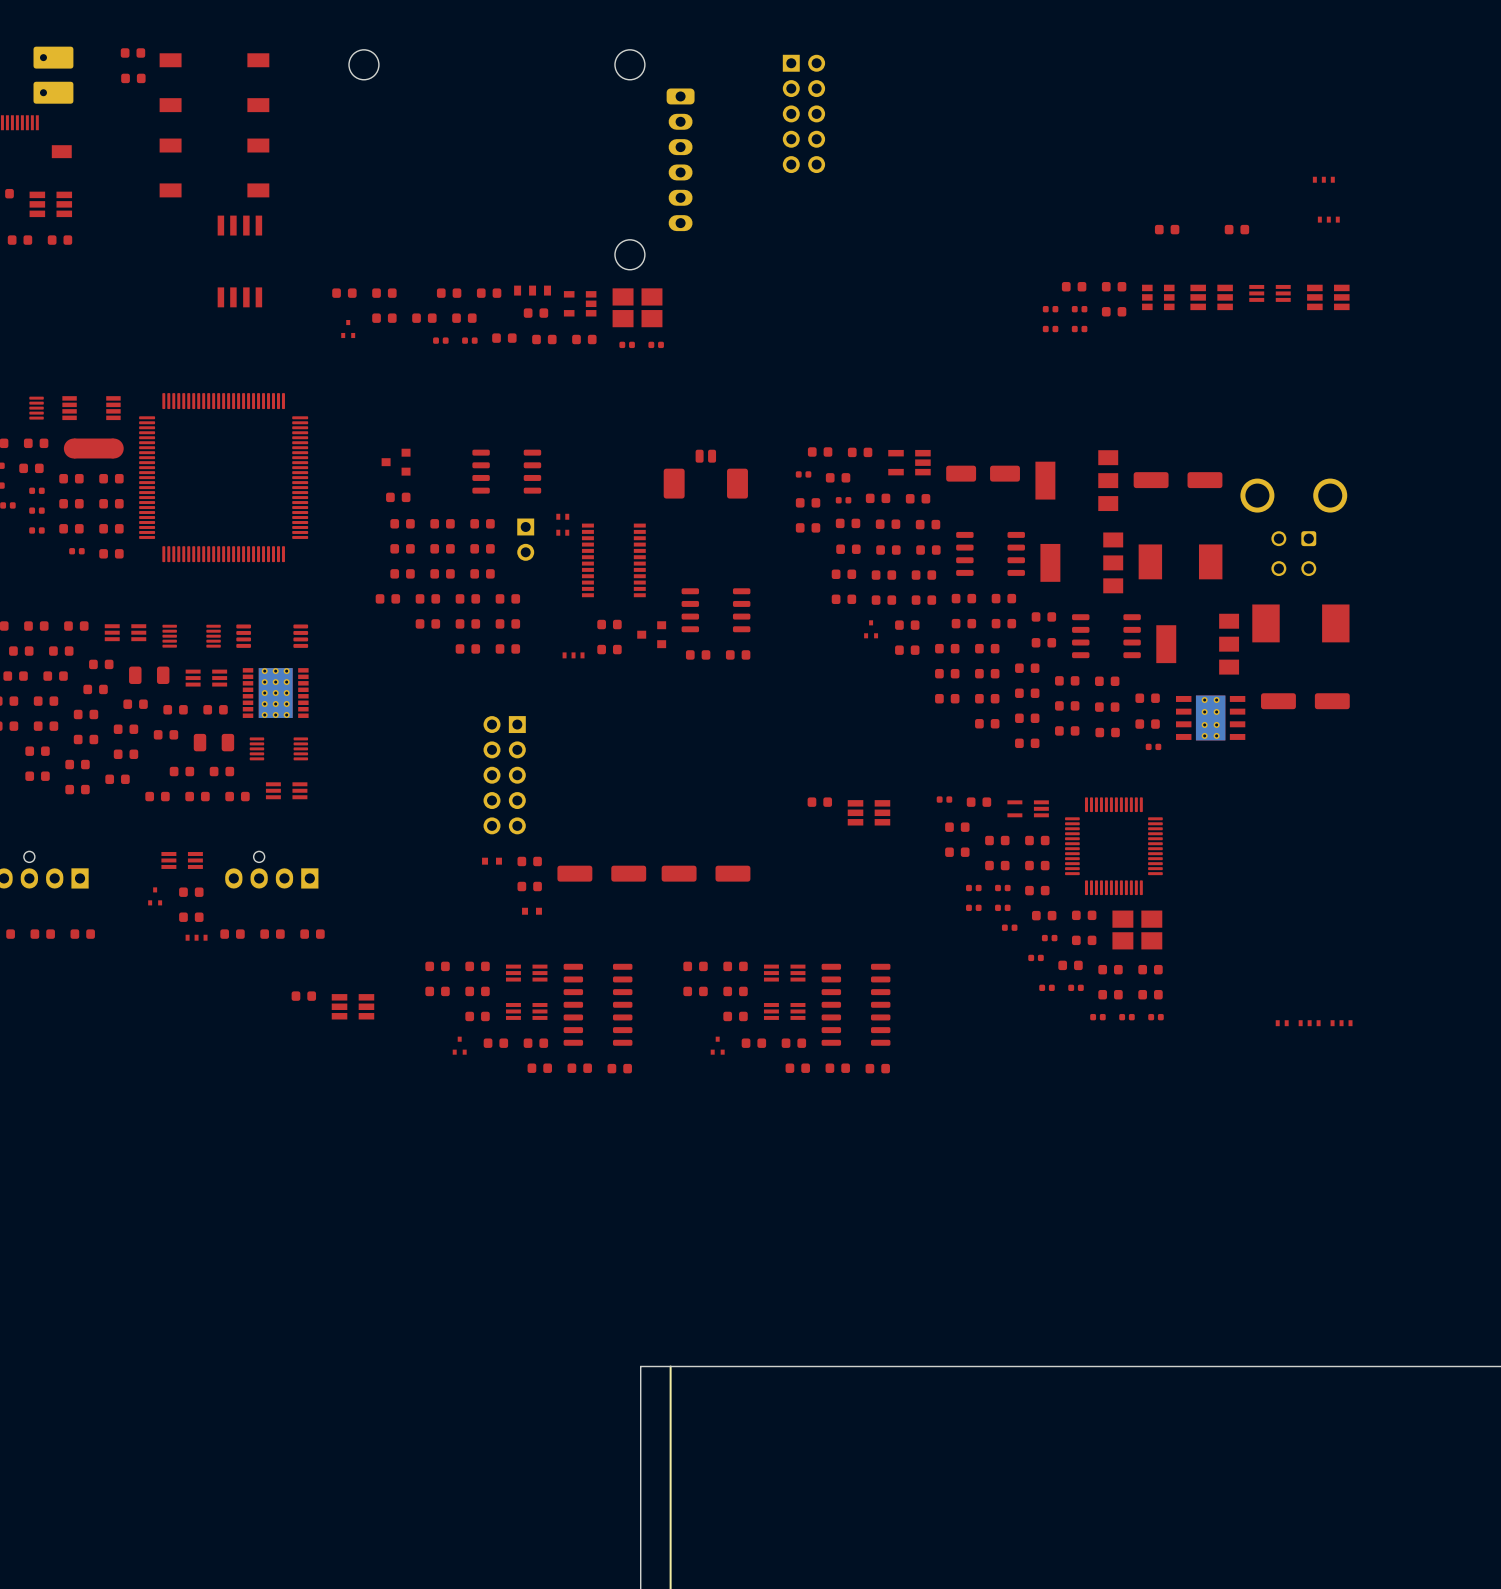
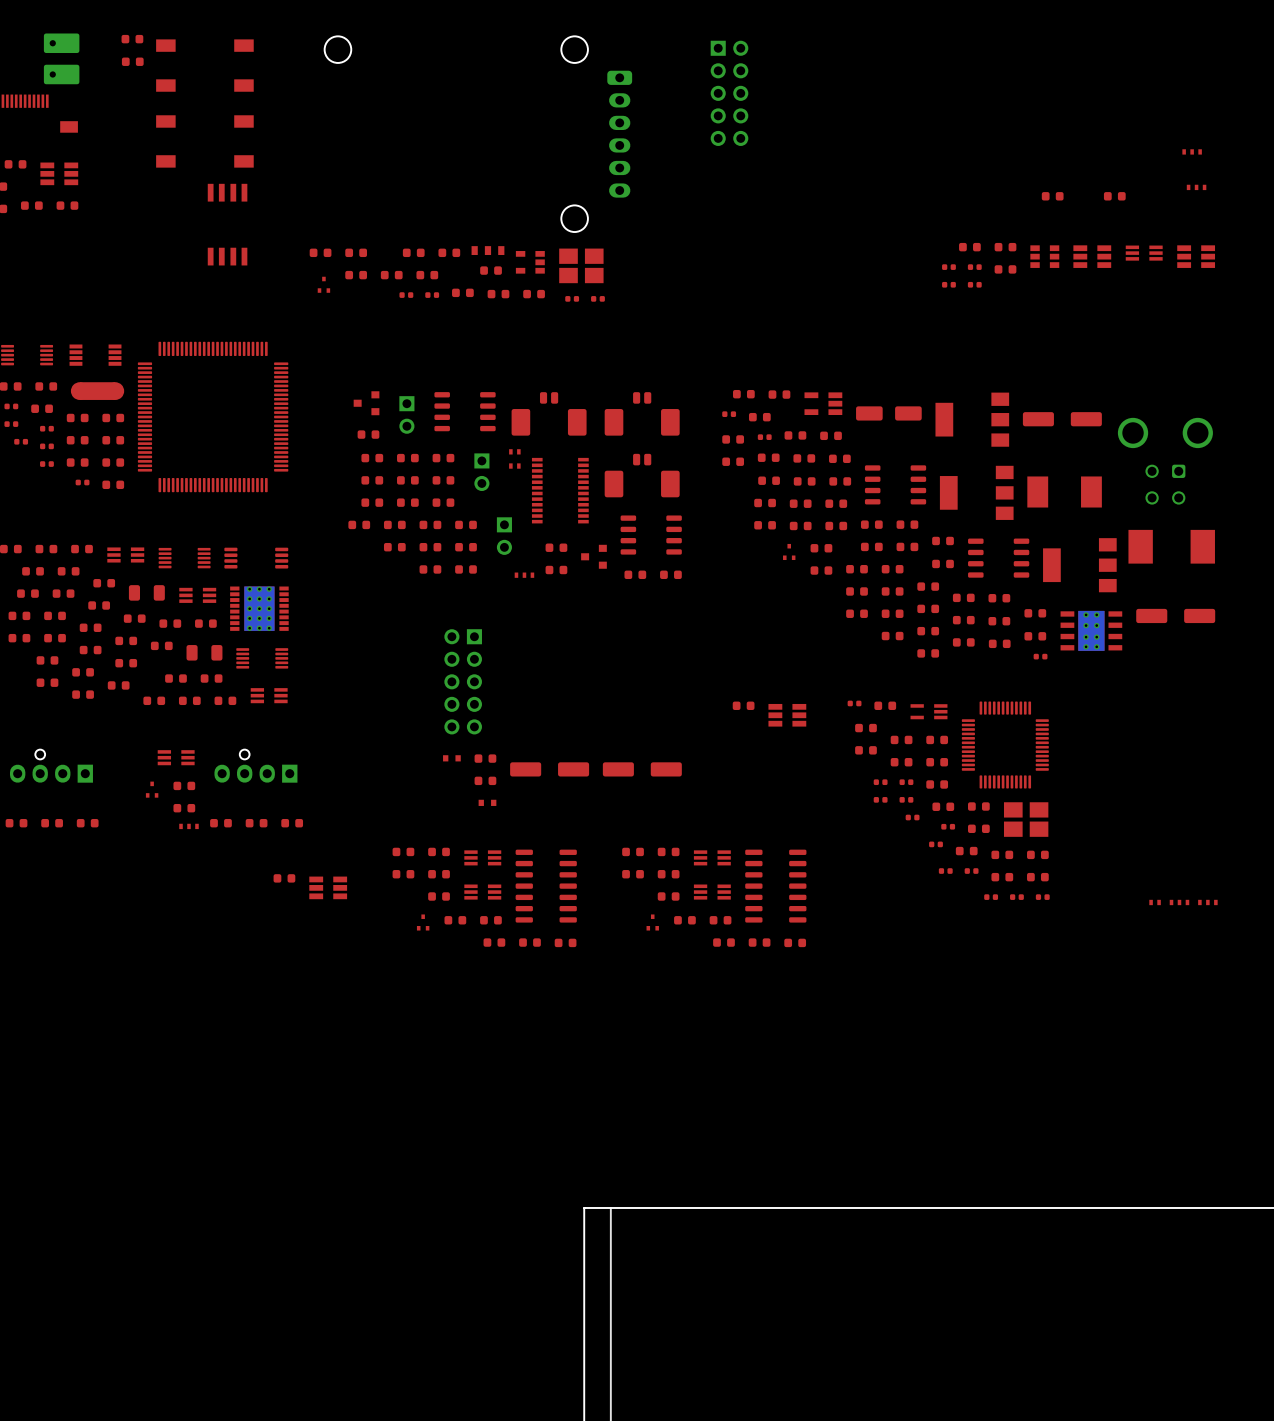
part: none -> (549, 413)
part: none -> (406, 414)
part: none -> (642, 475)
part: none -> (504, 536)

